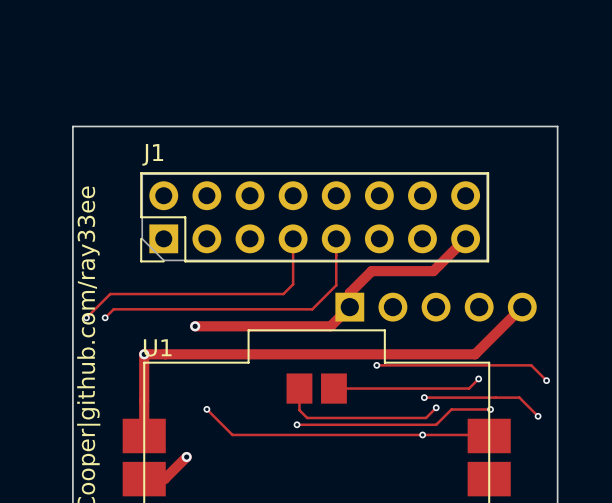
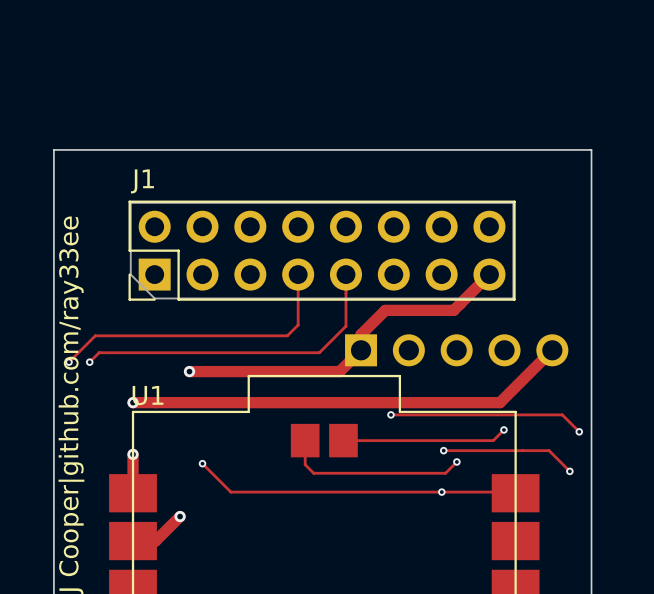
track: (144, 354) (144, 401) -> none
via: none -> (133, 454)
track: (490, 409) (451, 409) (436, 424) (297, 424) -> none
via: (490, 409) -> none
via: (297, 424) -> none

